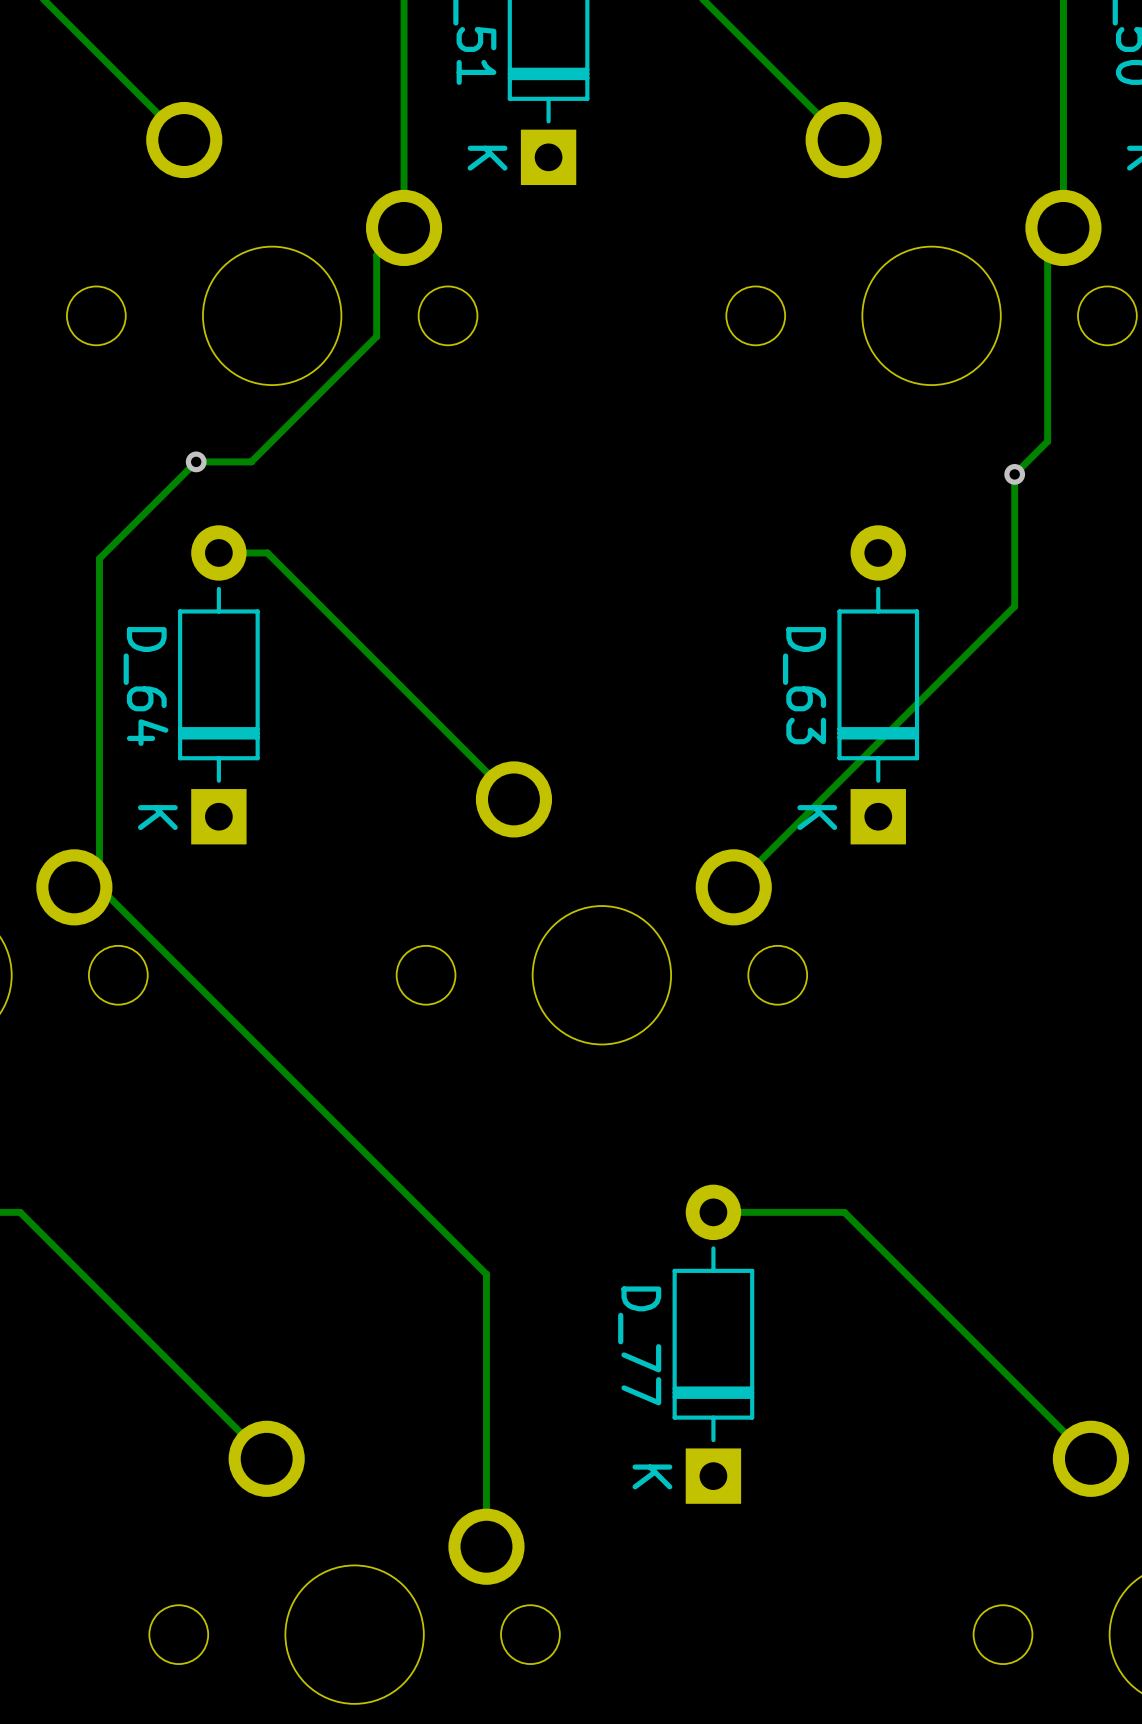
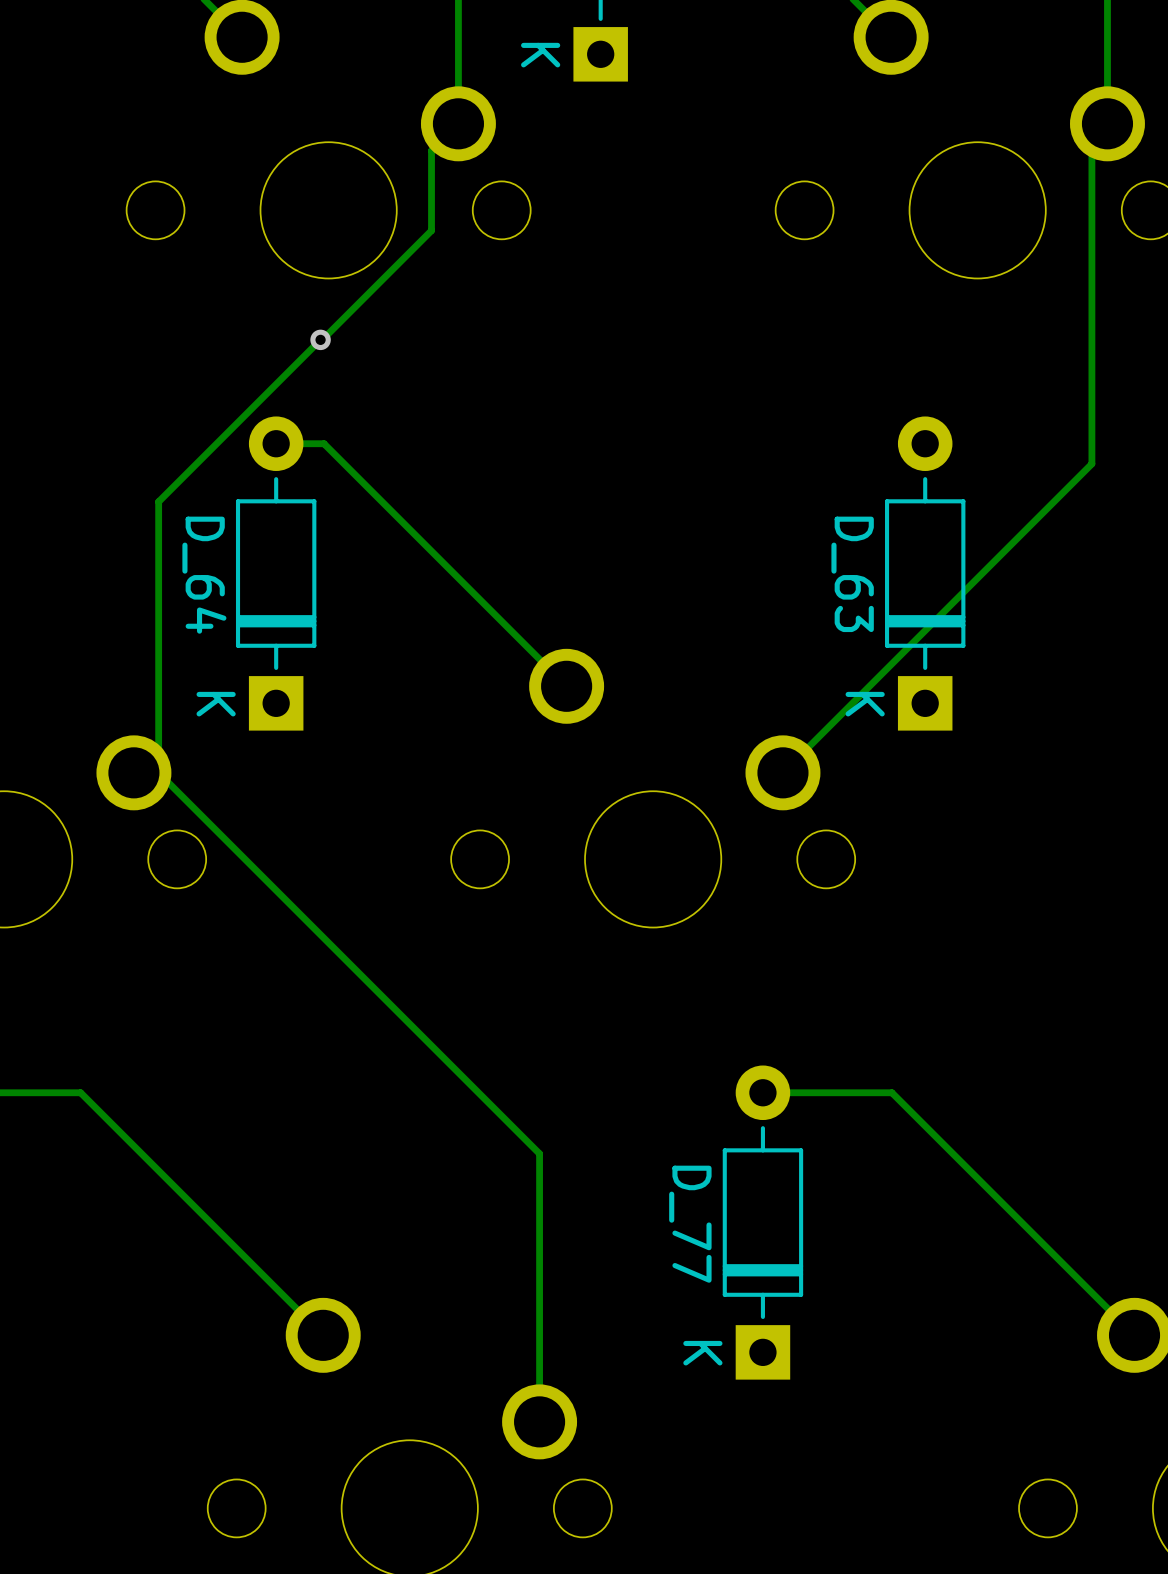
track: (1047, 441) (1014, 474) (1014, 606) -> (1091, 333) (1091, 463) (1059, 496)
track: (265, 447) (251, 461) (196, 461) (99, 558) (99, 611) -> (322, 339) (158, 501)
via position: (196, 461) -> (320, 339)
via: (1014, 474) -> none

